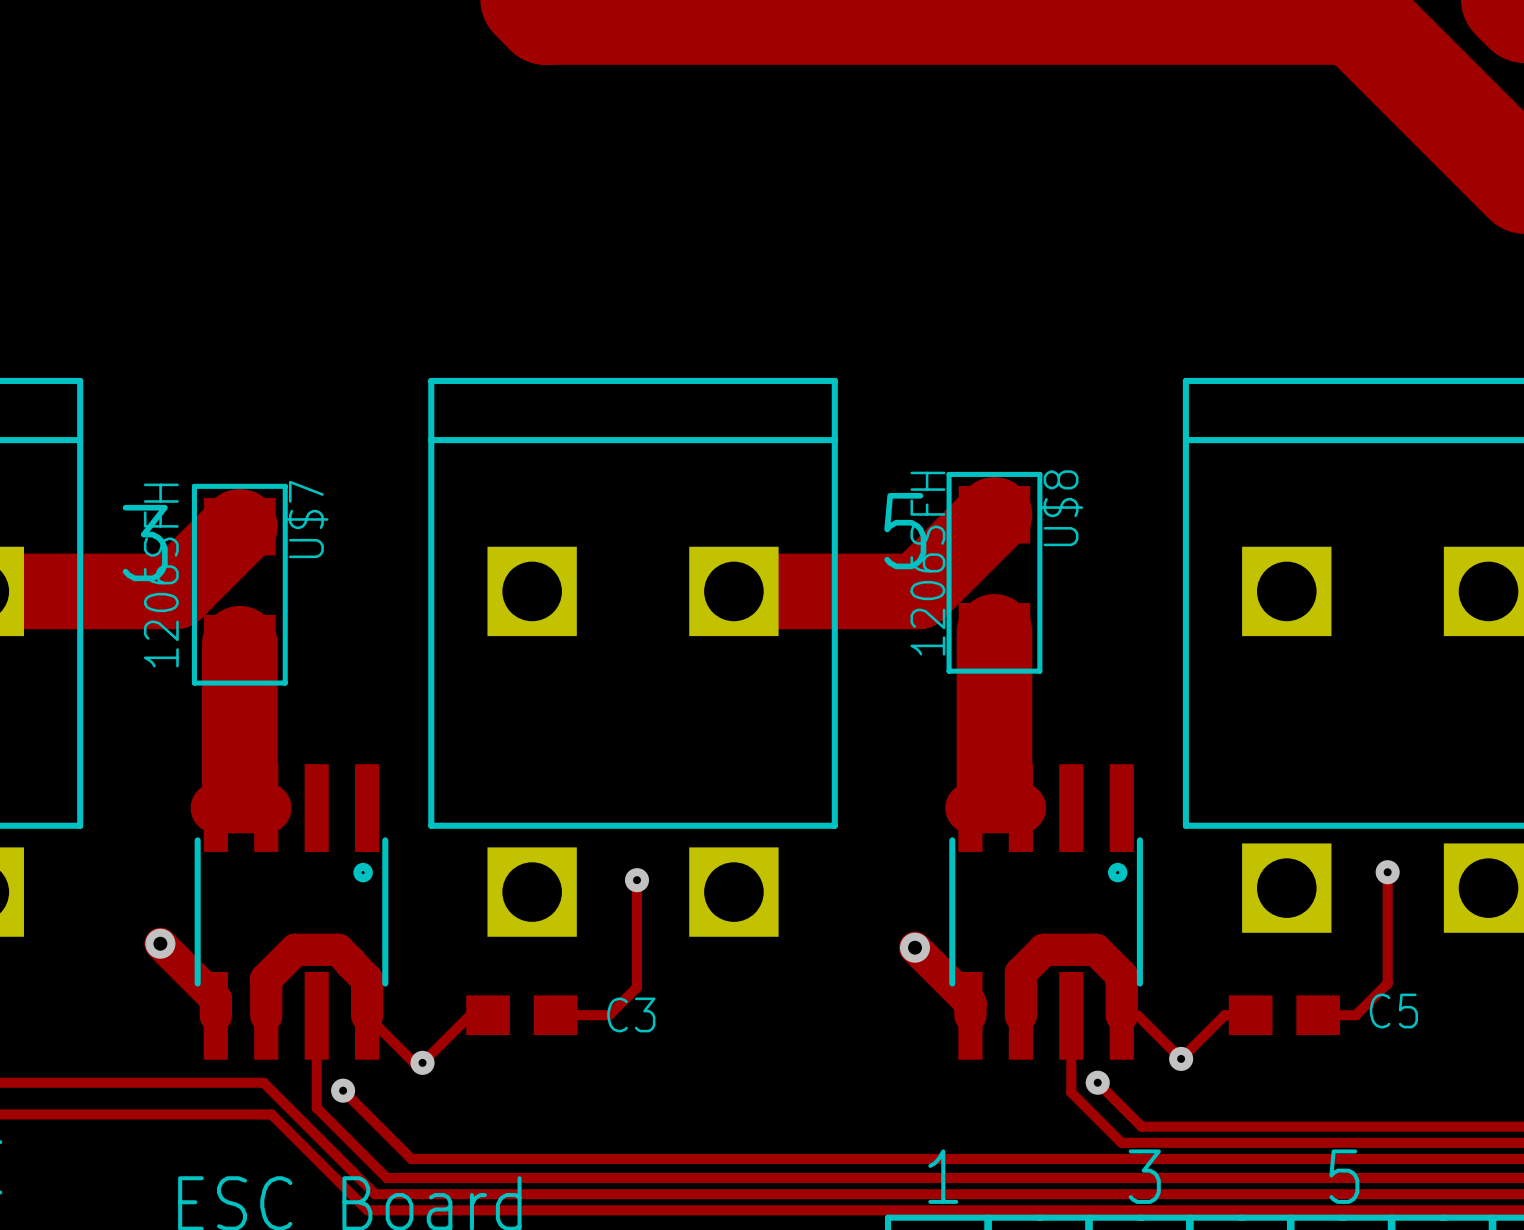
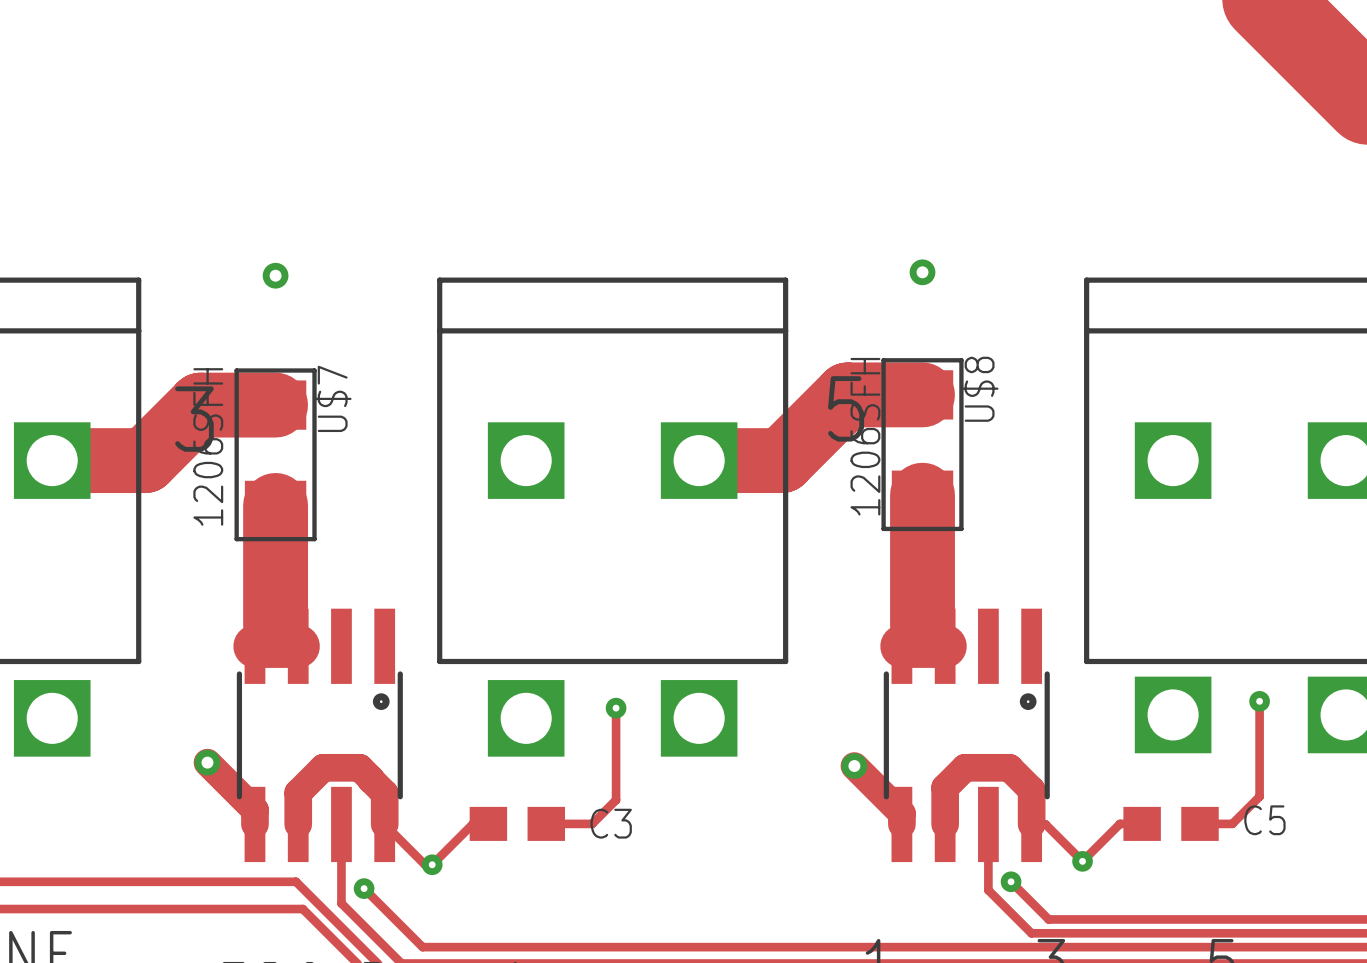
via: none -> (922, 272)
via: none -> (275, 275)
track: (994, 514) (917, 591) (830, 591) -> (922, 394) (847, 394) (781, 460)
track: (239, 526) (175, 591) (87, 591) -> (275, 405) (200, 405) (145, 460)

